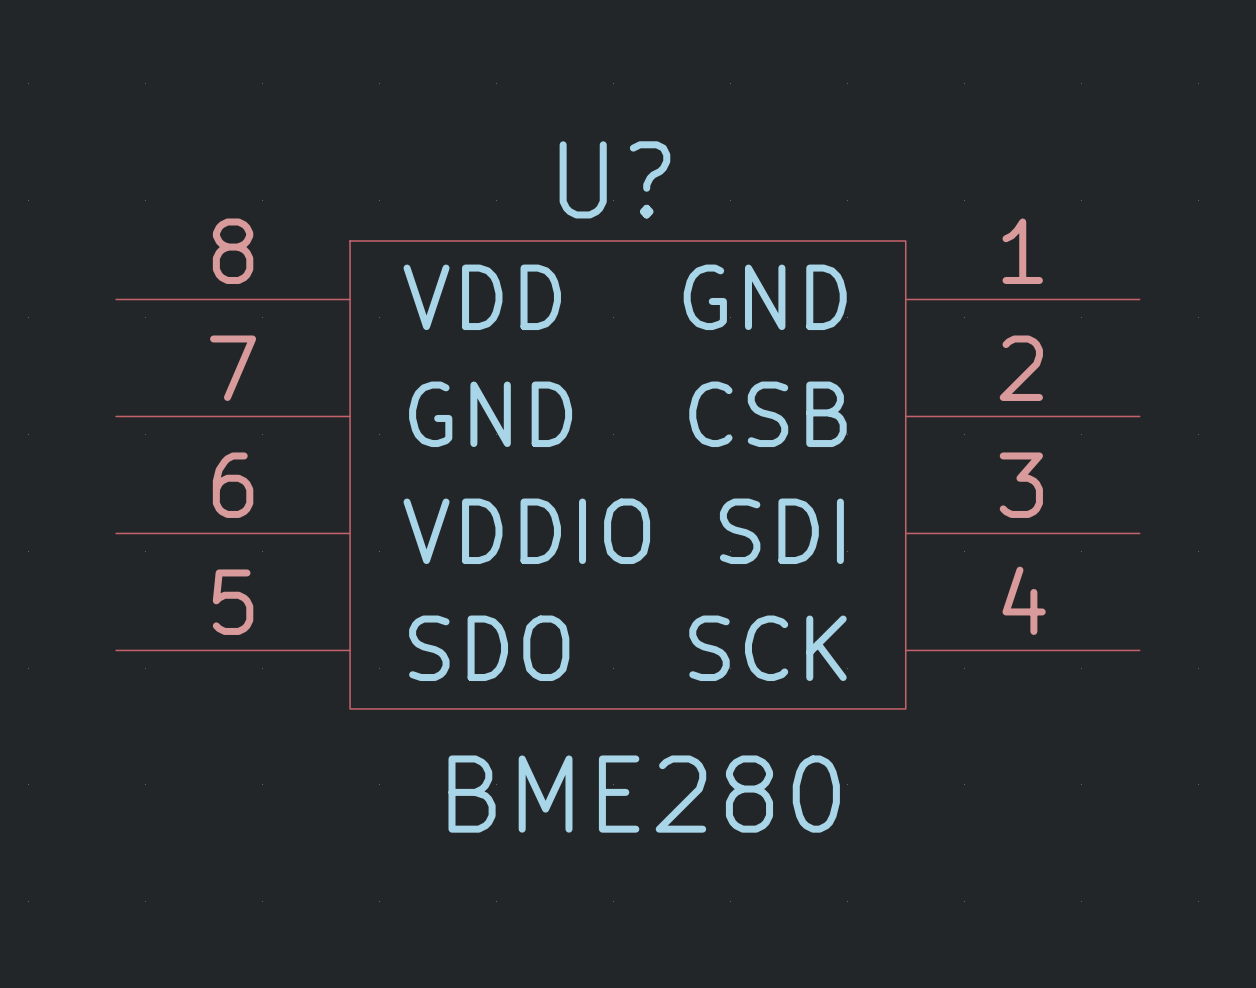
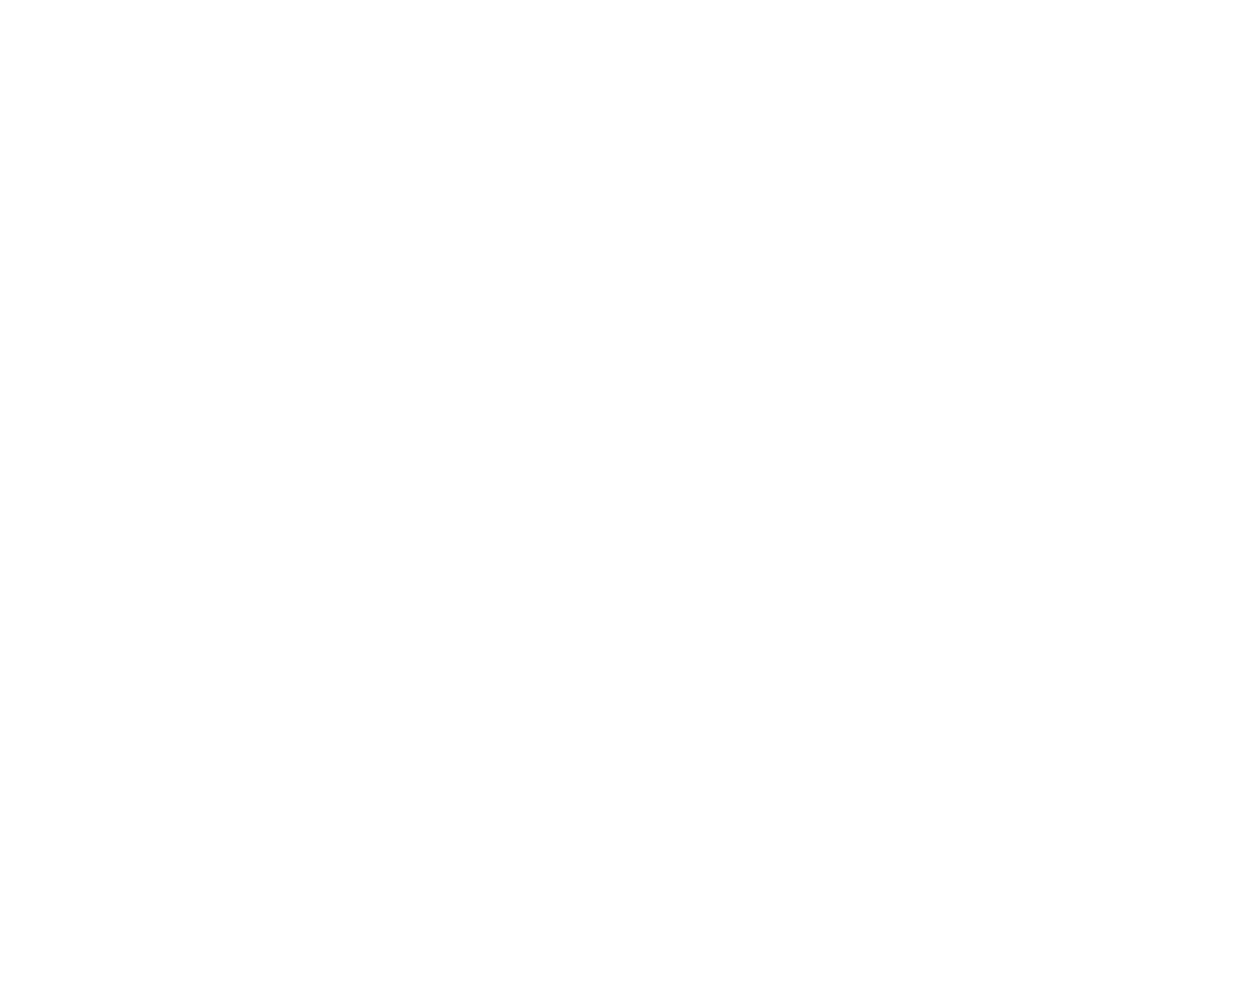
U?: BME280 (627, 474) -> none

